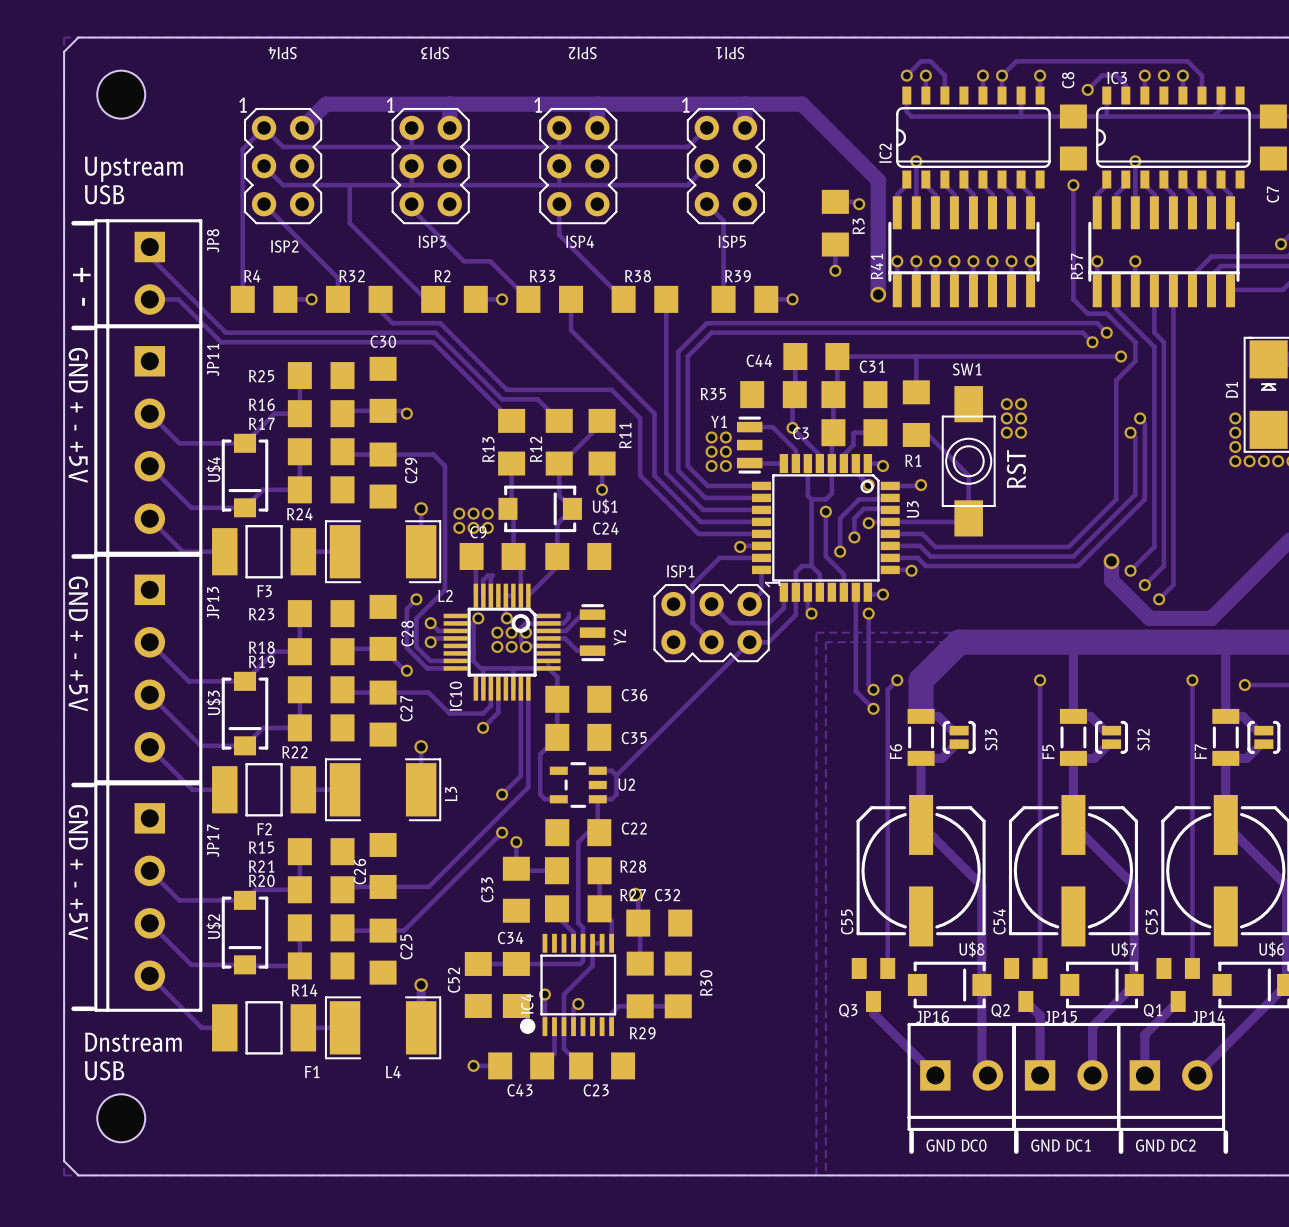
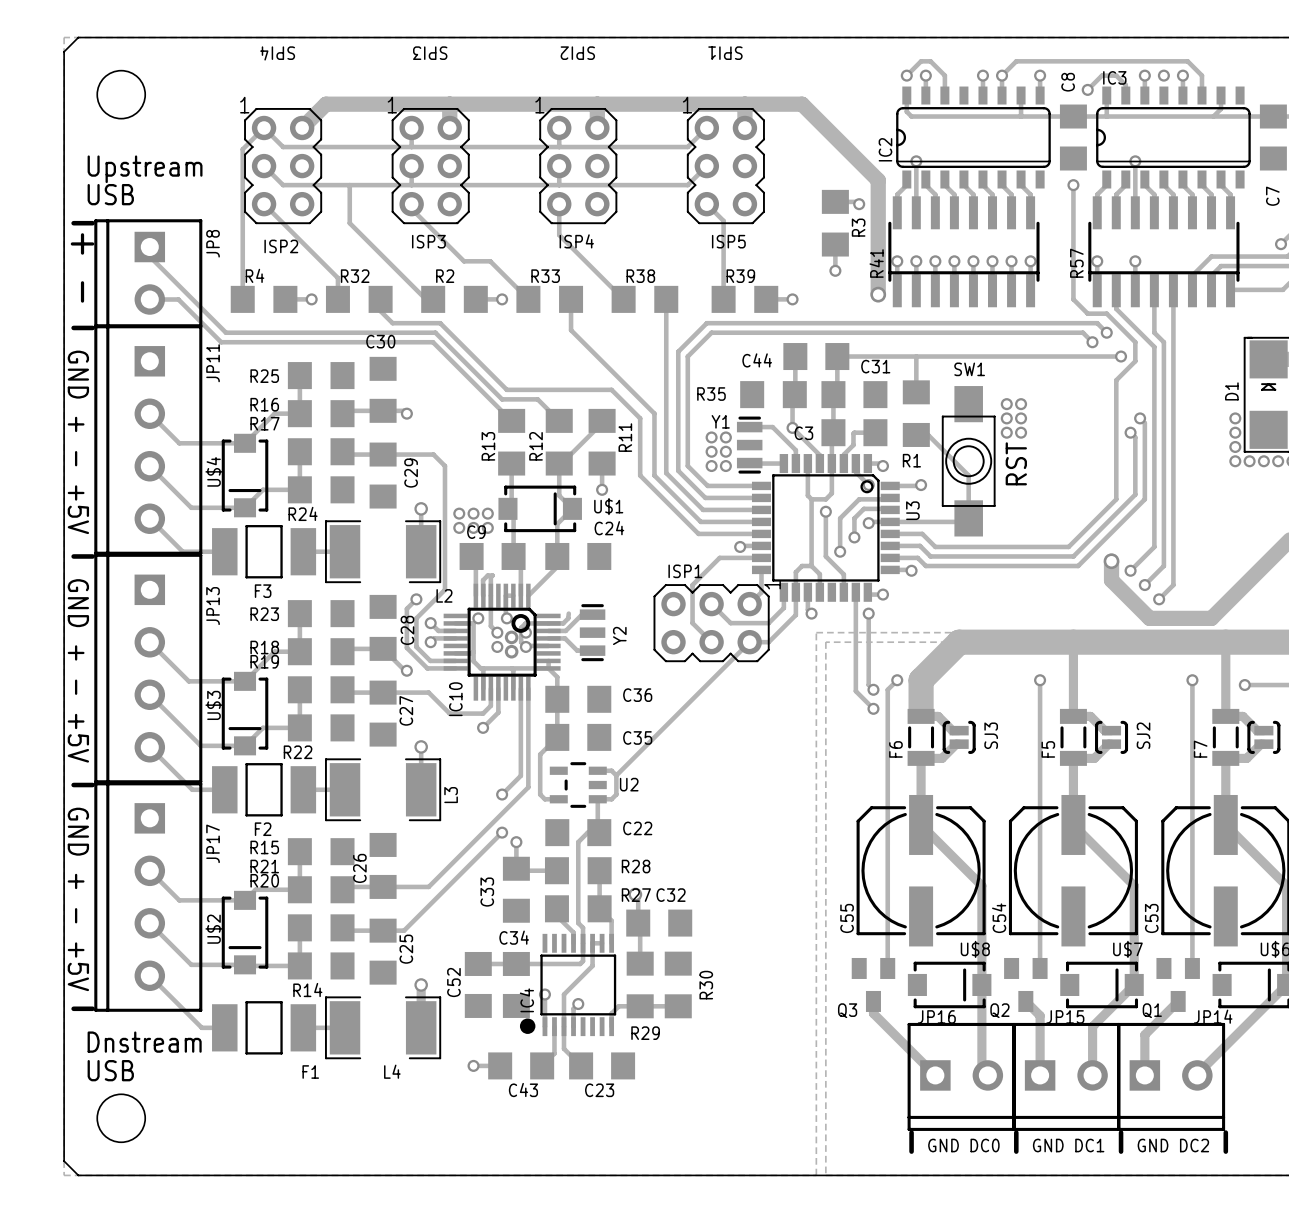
track: none -> (490, 595) (490, 626) (497, 632)
via: (511, 632) -> none
via: none -> (511, 637)
via: (511, 646) -> none
via: none -> (511, 651)

